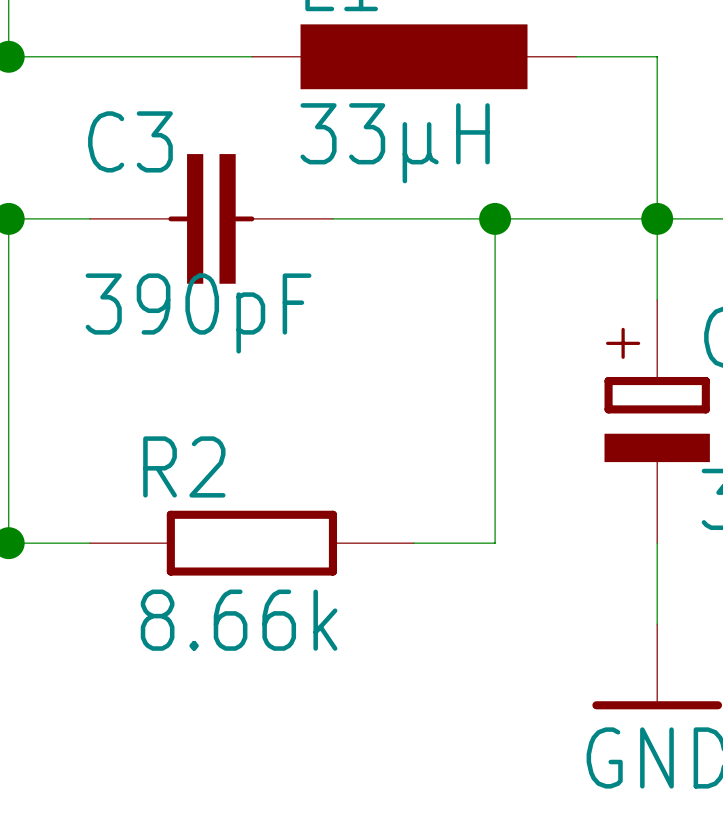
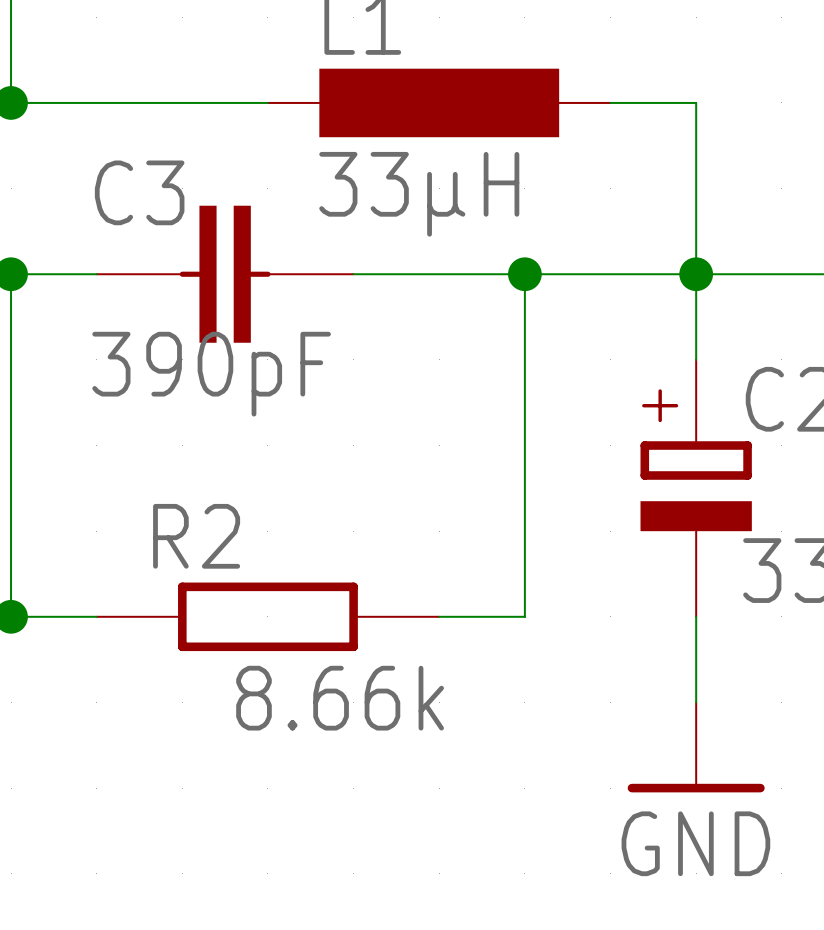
R2 value position: 8.66k (239, 620) -> 8.66k (340, 698)

